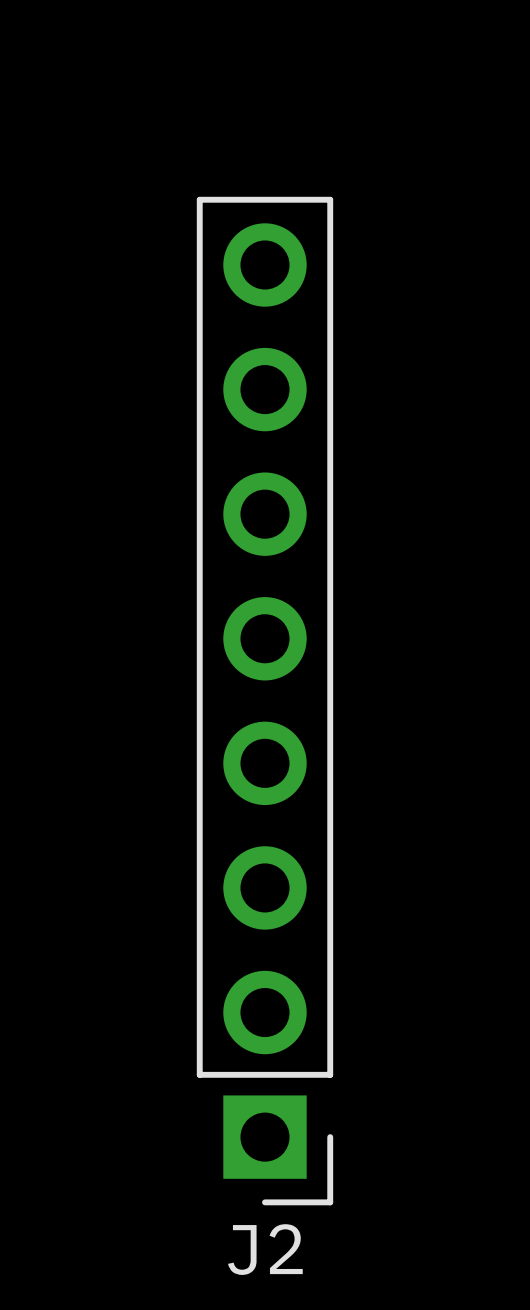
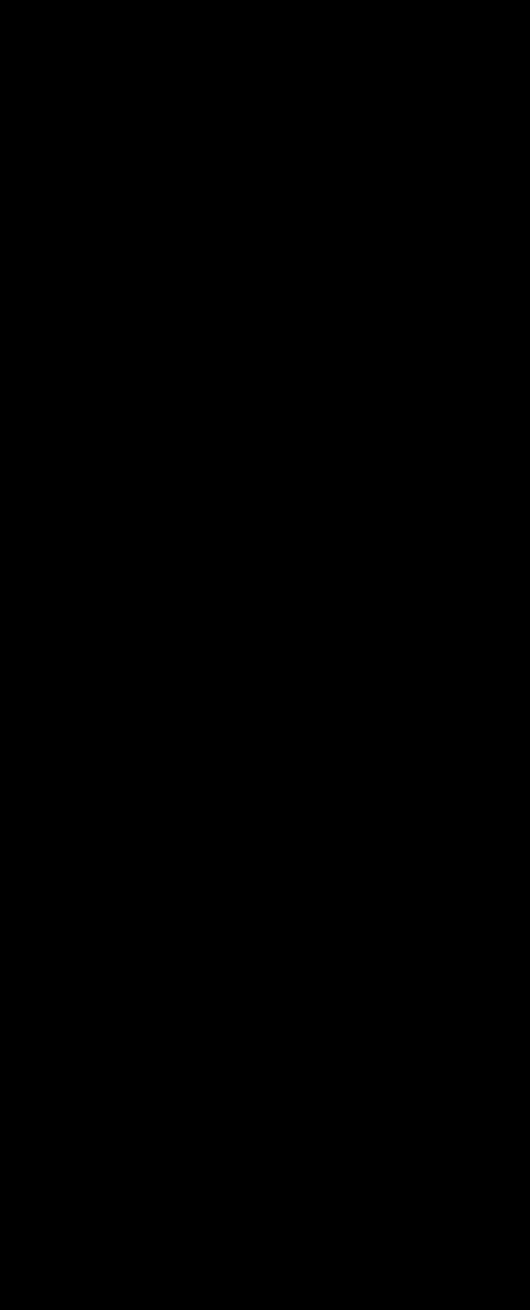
J2: (264, 701) -> none

